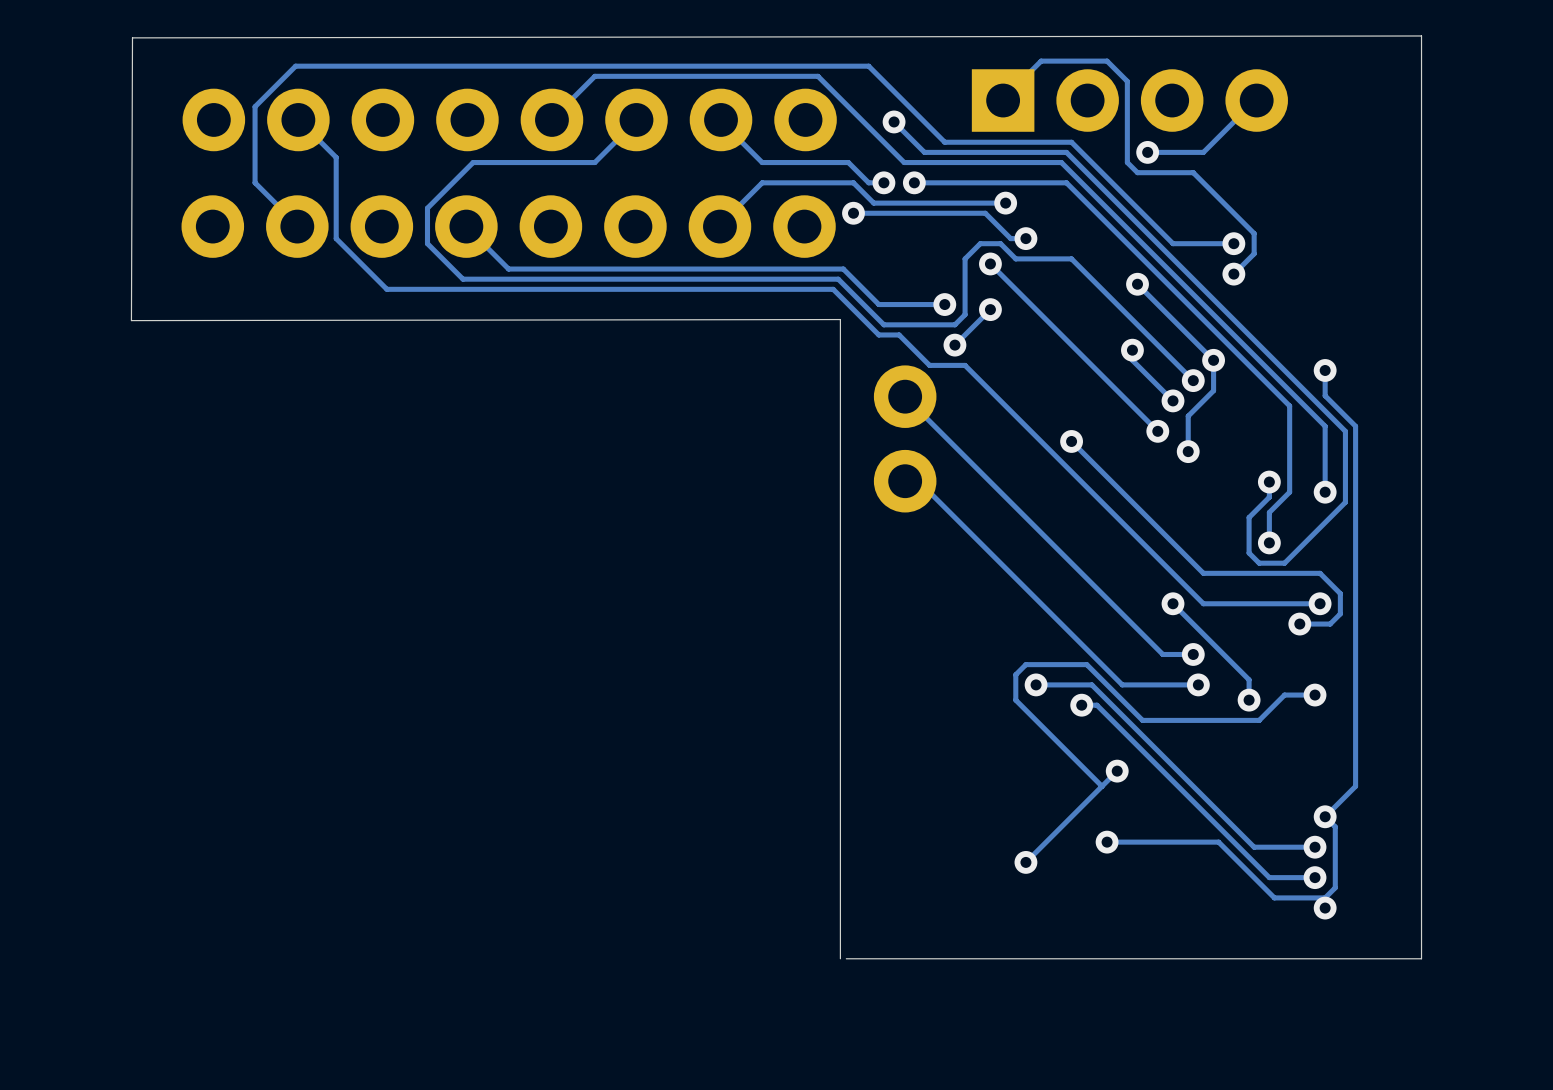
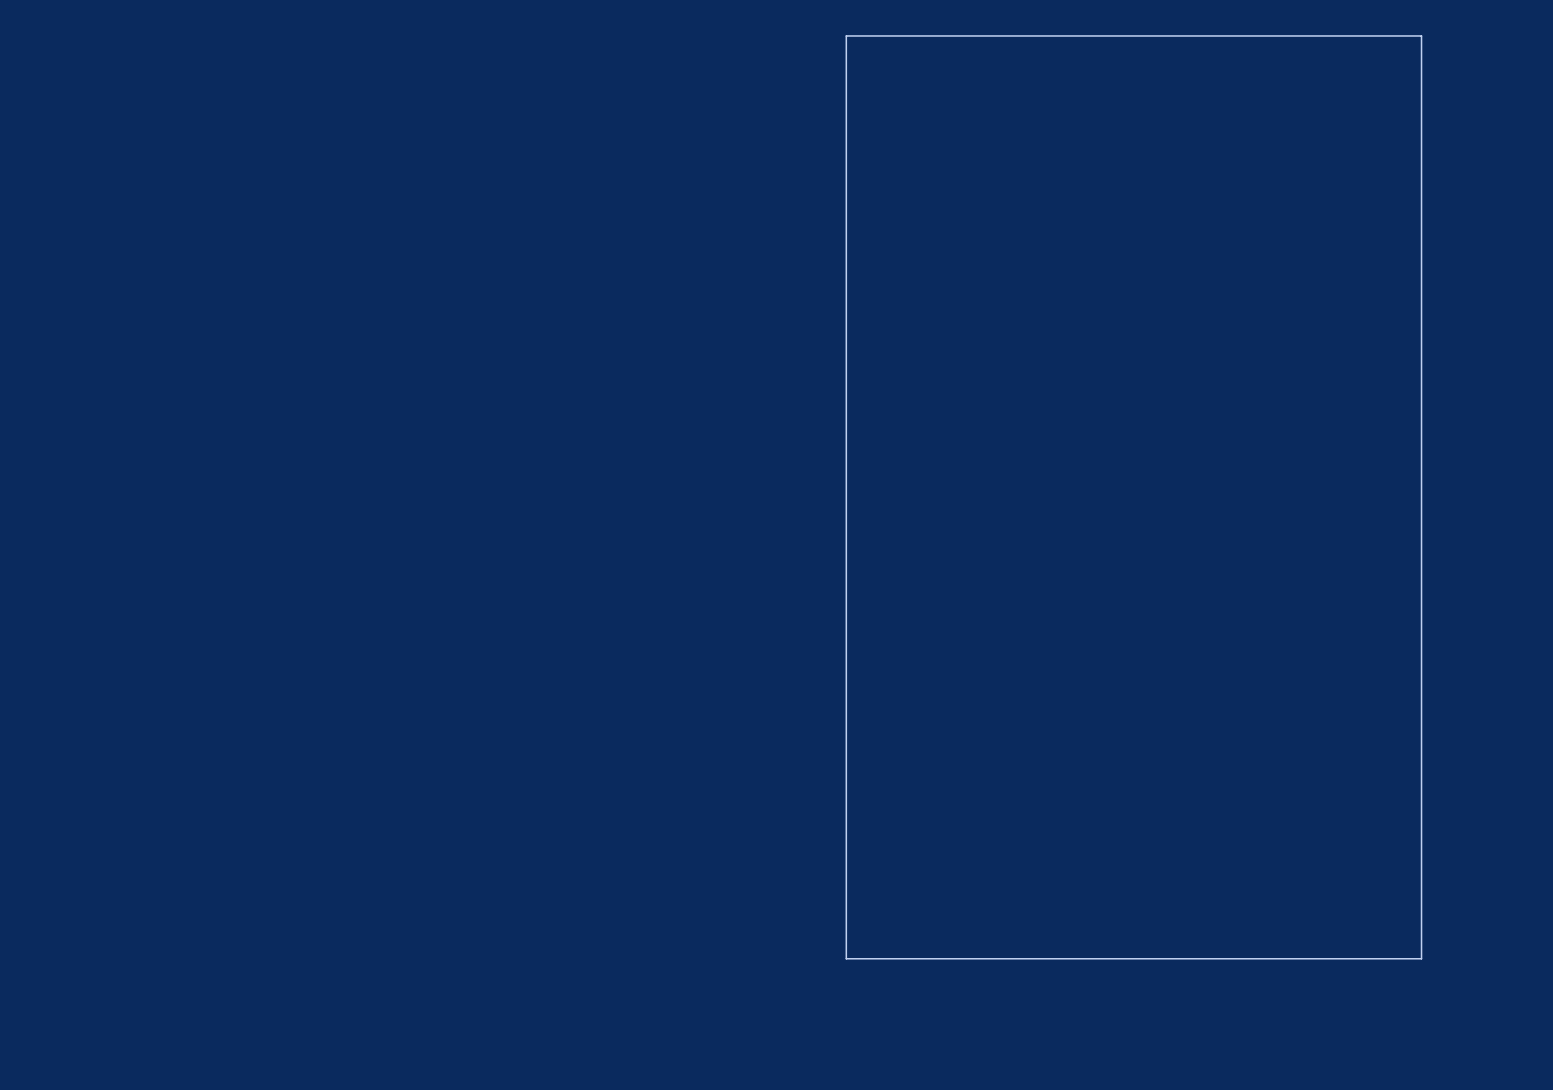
board edge: (1421, 35) (132, 37) -> (1421, 35) (846, 35) (846, 958)
board edge: (132, 37) (131, 320) (840, 319) (840, 958) -> none
track: (1003, 100) (1041, 61) (1107, 61) (1127, 81) (1127, 162) (1137, 172) (1193, 172) (1254, 233) (1254, 253) (1233, 274) -> none
part: (1129, 100) -> none
track: (1256, 100) (1203, 152) (1147, 152) -> none
track: (298, 119) (336, 157) (336, 238) (386, 289) (833, 289) (878, 334) (899, 334) (929, 365) (965, 365) (1203, 603) (1320, 603) -> none
part: (509, 119) -> none
track: (551, 119) (594, 76) (818, 76) (904, 162) (1061, 162) (1325, 426) (1325, 492) -> none
track: (636, 119) (594, 162) (473, 162) (427, 208) (427, 243) (462, 279) (838, 279) (883, 324) (954, 324) (965, 314) (965, 258) (980, 243) (1000, 243) (1015, 258) (1071, 258) (1193, 380) -> none
track: (721, 119) (762, 162) (848, 162) (868, 182) (883, 182) -> none
track: (894, 121) (924, 152) (1066, 152) (1345, 431) (1345, 502) (1284, 563) (1259, 563) (1249, 553) (1249, 517) (1269, 497) (1269, 482) -> none
via: (894, 121) -> none
via: (1147, 152) -> none
via: (883, 182) -> none
track: (914, 182) (1066, 182) (1289, 405) (1289, 492) (1269, 512) (1269, 542) -> none
via: (914, 182) -> none
track: (1005, 203) (873, 203) (853, 182) (762, 182) (719, 226) -> none
via: (1005, 203) -> none
track: (853, 213) (985, 213) (1010, 238) (1025, 238) -> none
via: (853, 213) -> none
track: (297, 226) (255, 182) (255, 106) (295, 66) (868, 66) (944, 142) (1071, 142) (1173, 243) (1233, 243) -> none
track: (466, 226) (508, 269) (843, 269) (878, 304) (944, 304) -> none
part: (508, 226) -> none
via: (1025, 238) -> none
via: (1233, 243) -> none
track: (990, 263) (1157, 431) -> none
via: (990, 263) -> none
via: (1233, 274) -> none
track: (1137, 284) (1213, 360) (1213, 390) (1188, 416) (1188, 451) -> none
via: (1137, 284) -> none
via: (944, 304) -> none
track: (990, 309) (954, 345) -> none
via: (990, 309) -> none
via: (954, 345) -> none
track: (1132, 350) (1132, 360) (1173, 400) -> none
via: (1132, 350) -> none
via: (1213, 360) -> none
track: (1325, 370) (1325, 395) (1355, 426) (1355, 786) (1325, 816) (1335, 826) (1335, 887) (1325, 897) -> none
via: (1325, 370) -> none
via: (1193, 380) -> none
track: (905, 396) (1162, 654) (1193, 654) -> none
via: (1173, 400) -> none
via: (1157, 431) -> none
part: (905, 438) -> none
track: (1071, 441) (1203, 573) (1320, 573) (1340, 593) (1340, 613) (1330, 624) (1299, 624) -> none
via: (1071, 441) -> none
via: (1188, 451) -> none
track: (905, 481) (919, 482) (1122, 684) (1198, 684) -> none
via: (1269, 482) -> none
via: (1325, 492) -> none
via: (1269, 542) -> none
track: (1173, 603) (1249, 679) (1249, 700) -> none
via: (1173, 603) -> none
via: (1320, 603) -> none
via: (1299, 624) -> none
via: (1193, 654) -> none
track: (1036, 684) (1091, 684) (1254, 847) (1315, 847) -> none
via: (1036, 684) -> none
via: (1198, 684) -> none
track: (1315, 695) (1284, 695) (1259, 720) (1142, 720) (1086, 664) (1025, 664) (1015, 674) (1015, 700) (1102, 786) -> none
via: (1315, 695) -> none
via: (1249, 700) -> none
track: (1081, 705) (1096, 705) (1269, 877) (1315, 877) -> none
via: (1081, 705) -> none
track: (1117, 771) (1025, 862) -> none
via: (1117, 771) -> none
via: (1325, 816) -> none
track: (1107, 842) (1218, 842) (1274, 897) (1325, 897) -> none
via: (1107, 842) -> none
via: (1315, 847) -> none
via: (1025, 862) -> none
via: (1315, 877) -> none
via: (1325, 908) -> none

